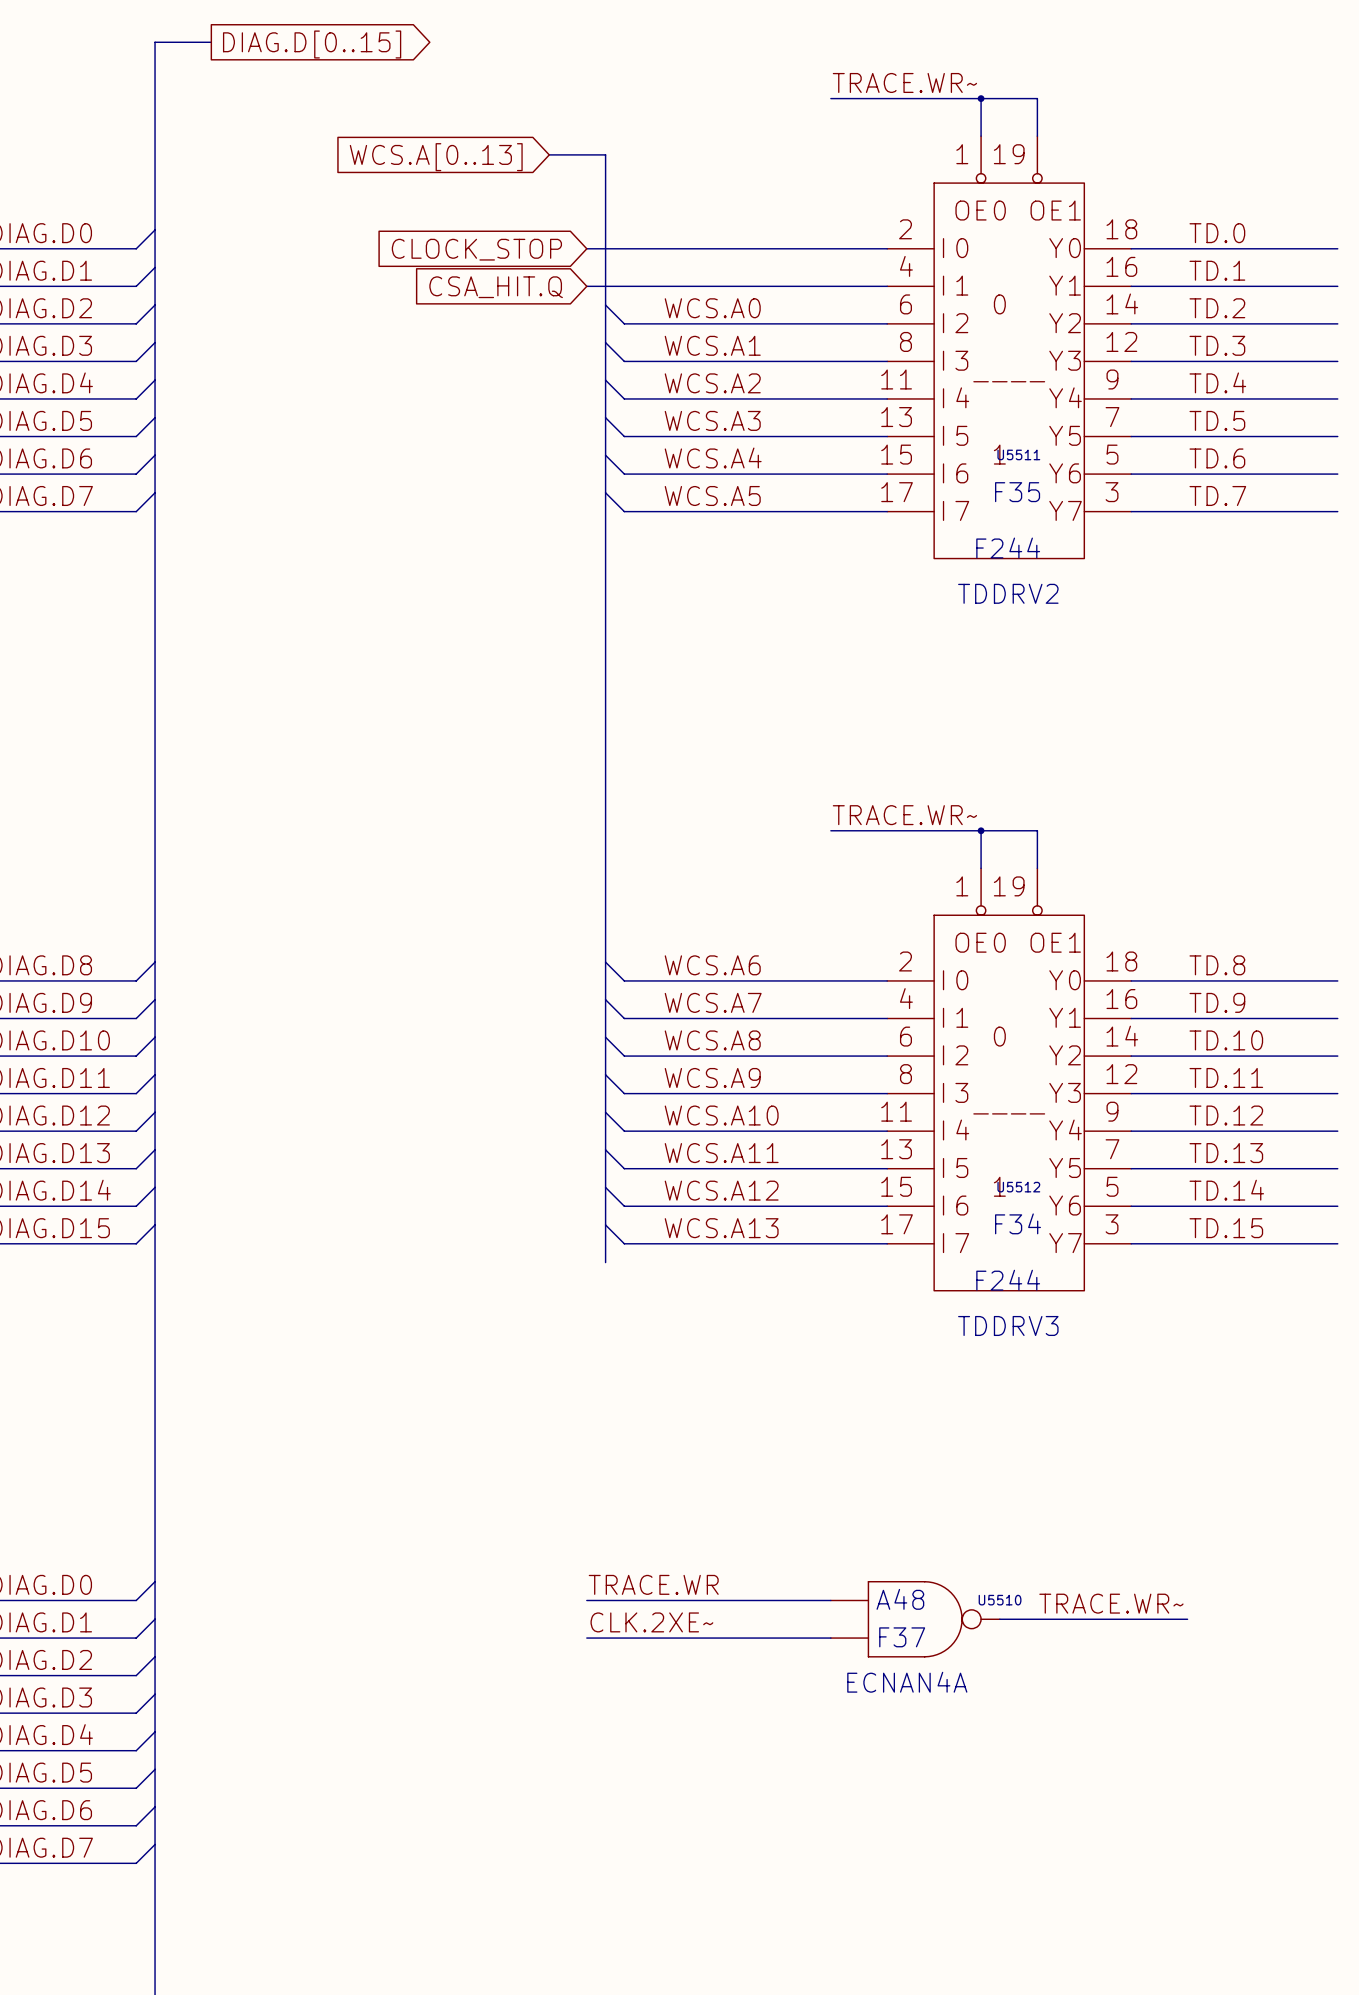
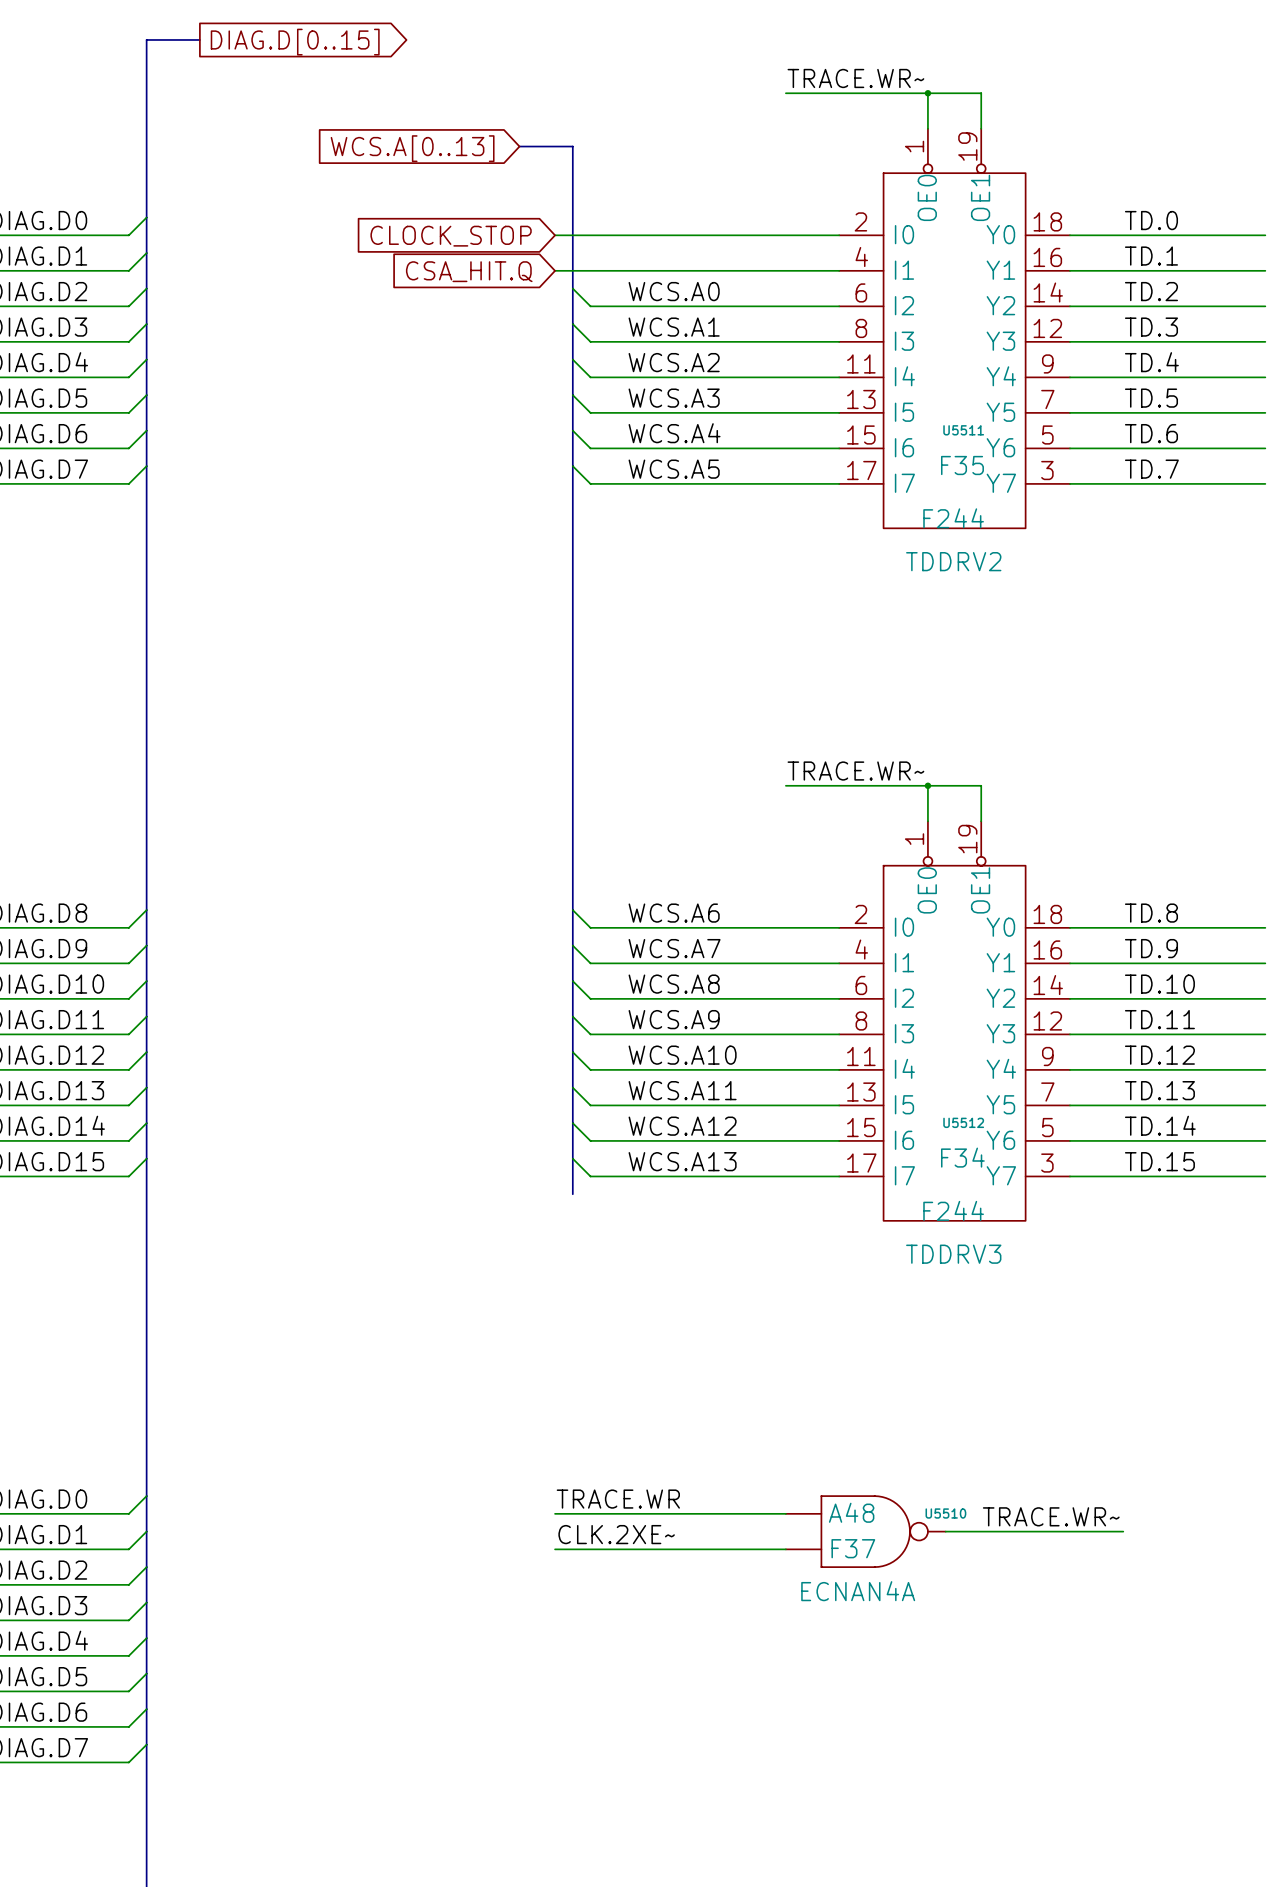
U5511 symbol: [887, 136, 1132, 559] -> [839, 128, 1071, 529]
U5512 symbol: [887, 868, 1132, 1291] -> [839, 821, 1071, 1221]

